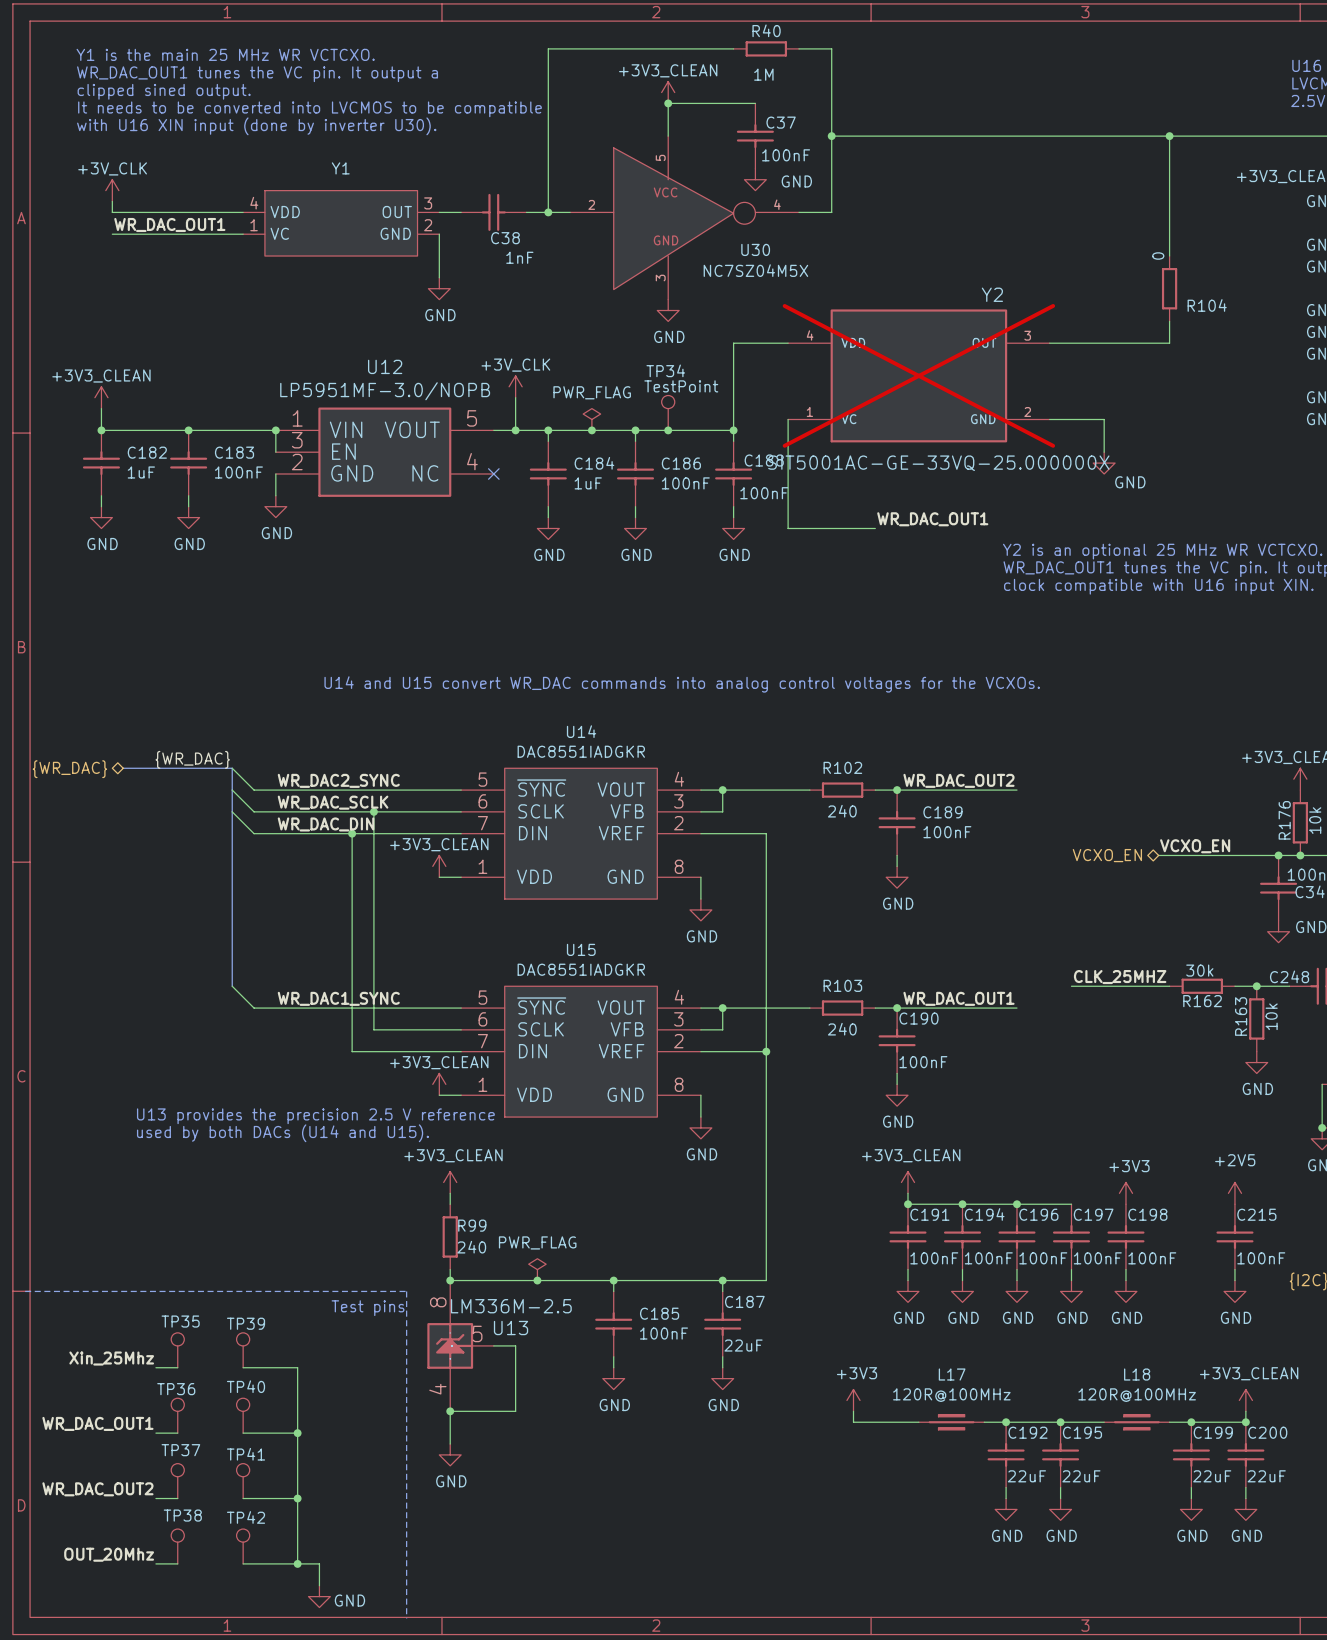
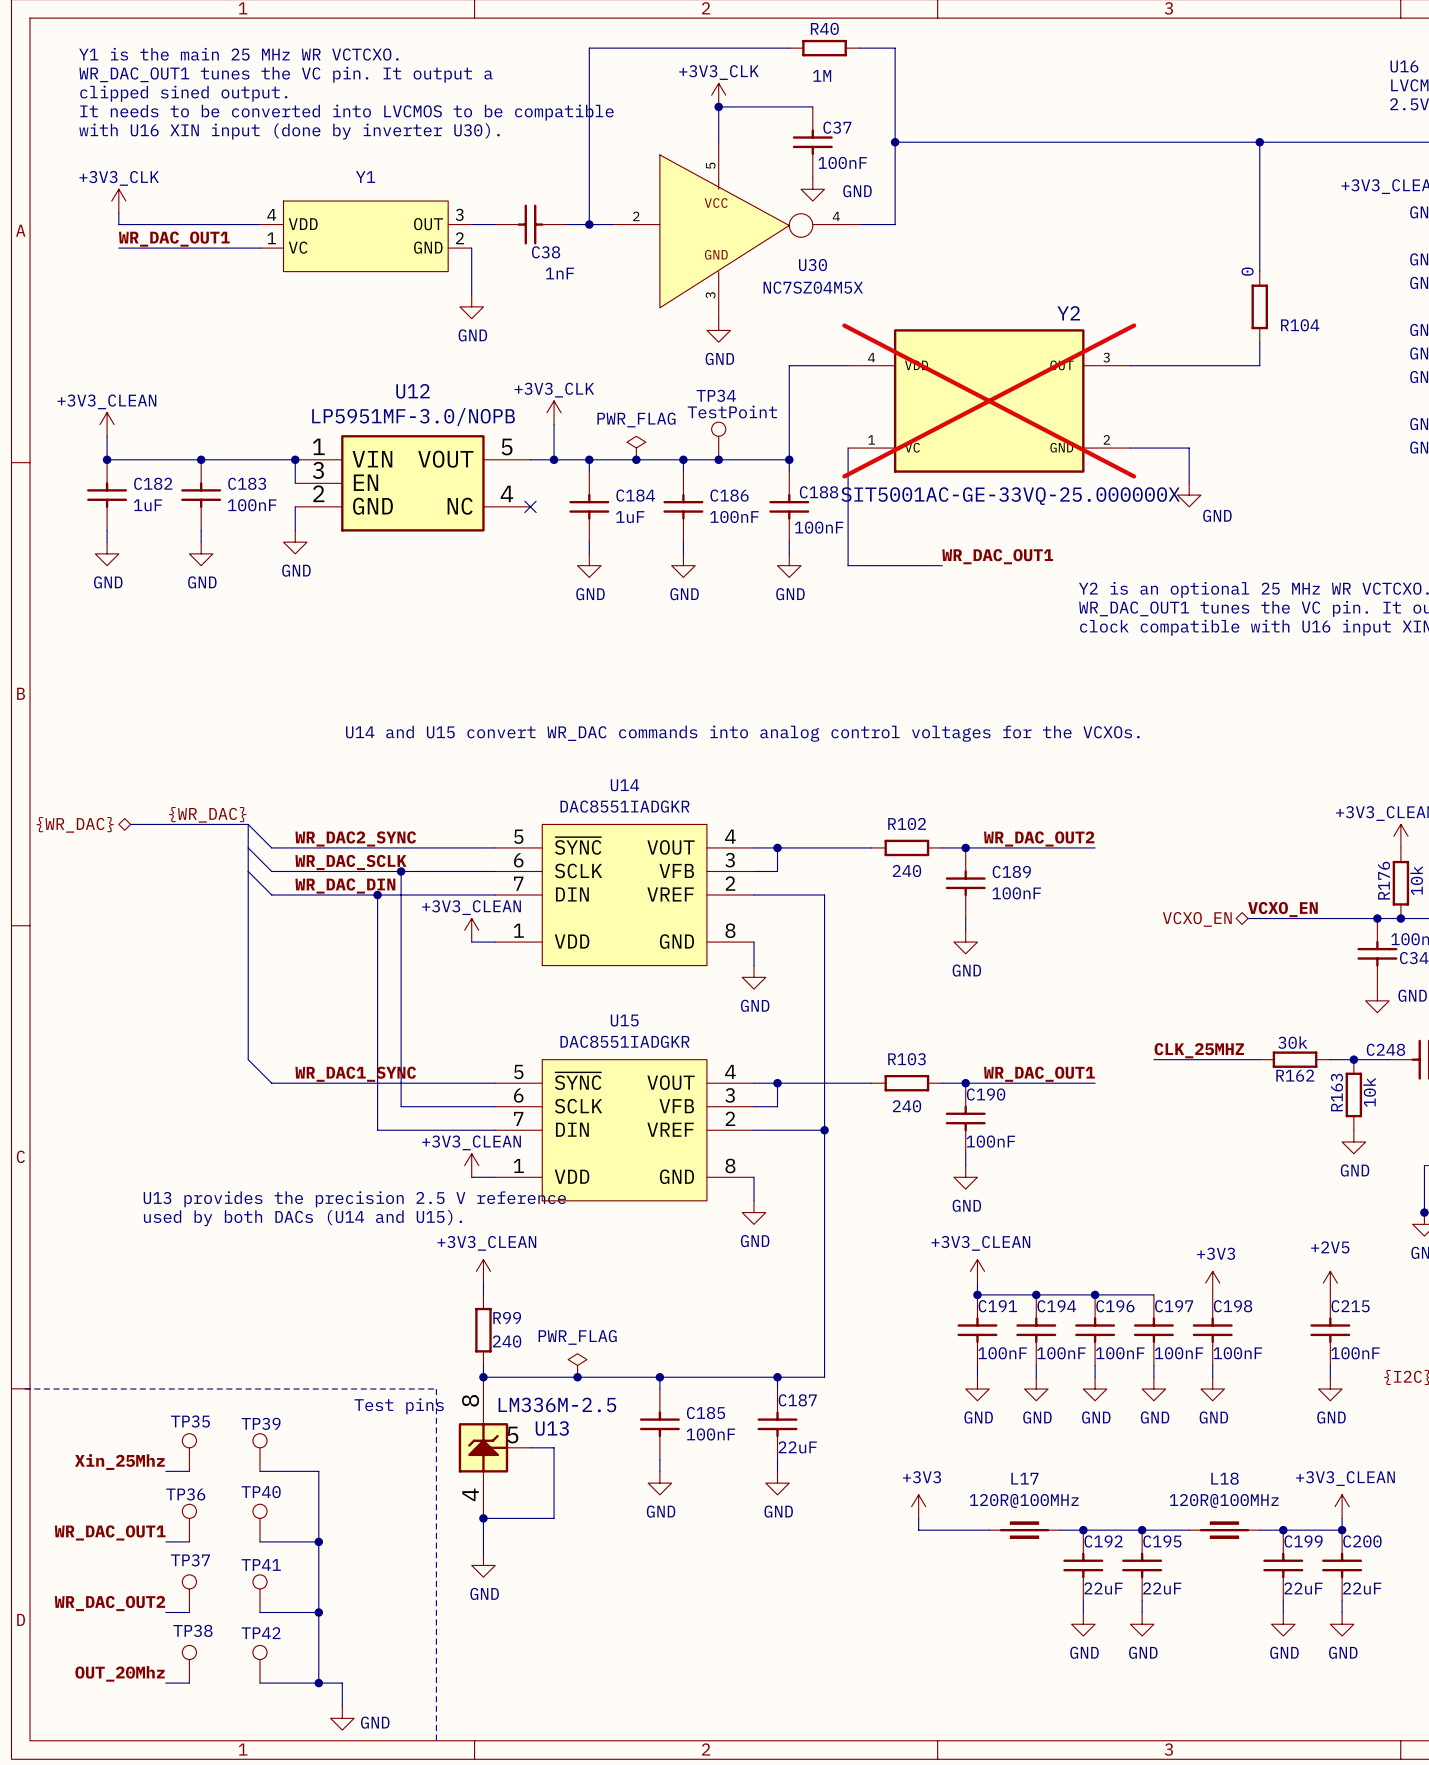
power symbol: +3V3_CLEAN (668, 92) -> +3V3_CLK (718, 95)
power symbol: +3V_CLK (112, 190) -> +3V3_CLK (118, 201)
power symbol: +3V_CLK (515, 386) -> +3V3_CLK (554, 412)

